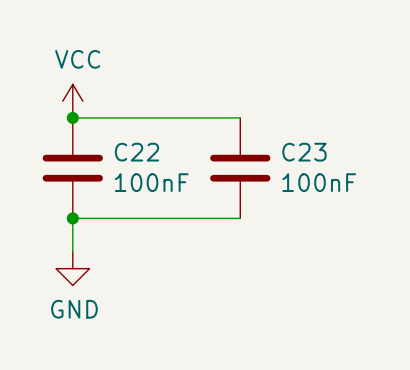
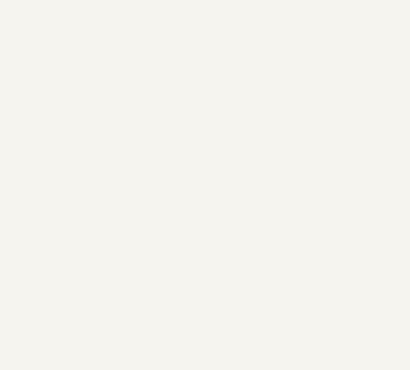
power symbol: VCC (72, 101) -> none
wire: (72, 117) (240, 117) -> none
junction: (72, 117) -> none
C22: 100nF (72, 168) -> none
C23: 100nF (240, 168) -> none
junction: (72, 218) -> none
wire: (240, 218) (72, 218) (72, 251) -> none
power symbol: GND (72, 268) -> none

